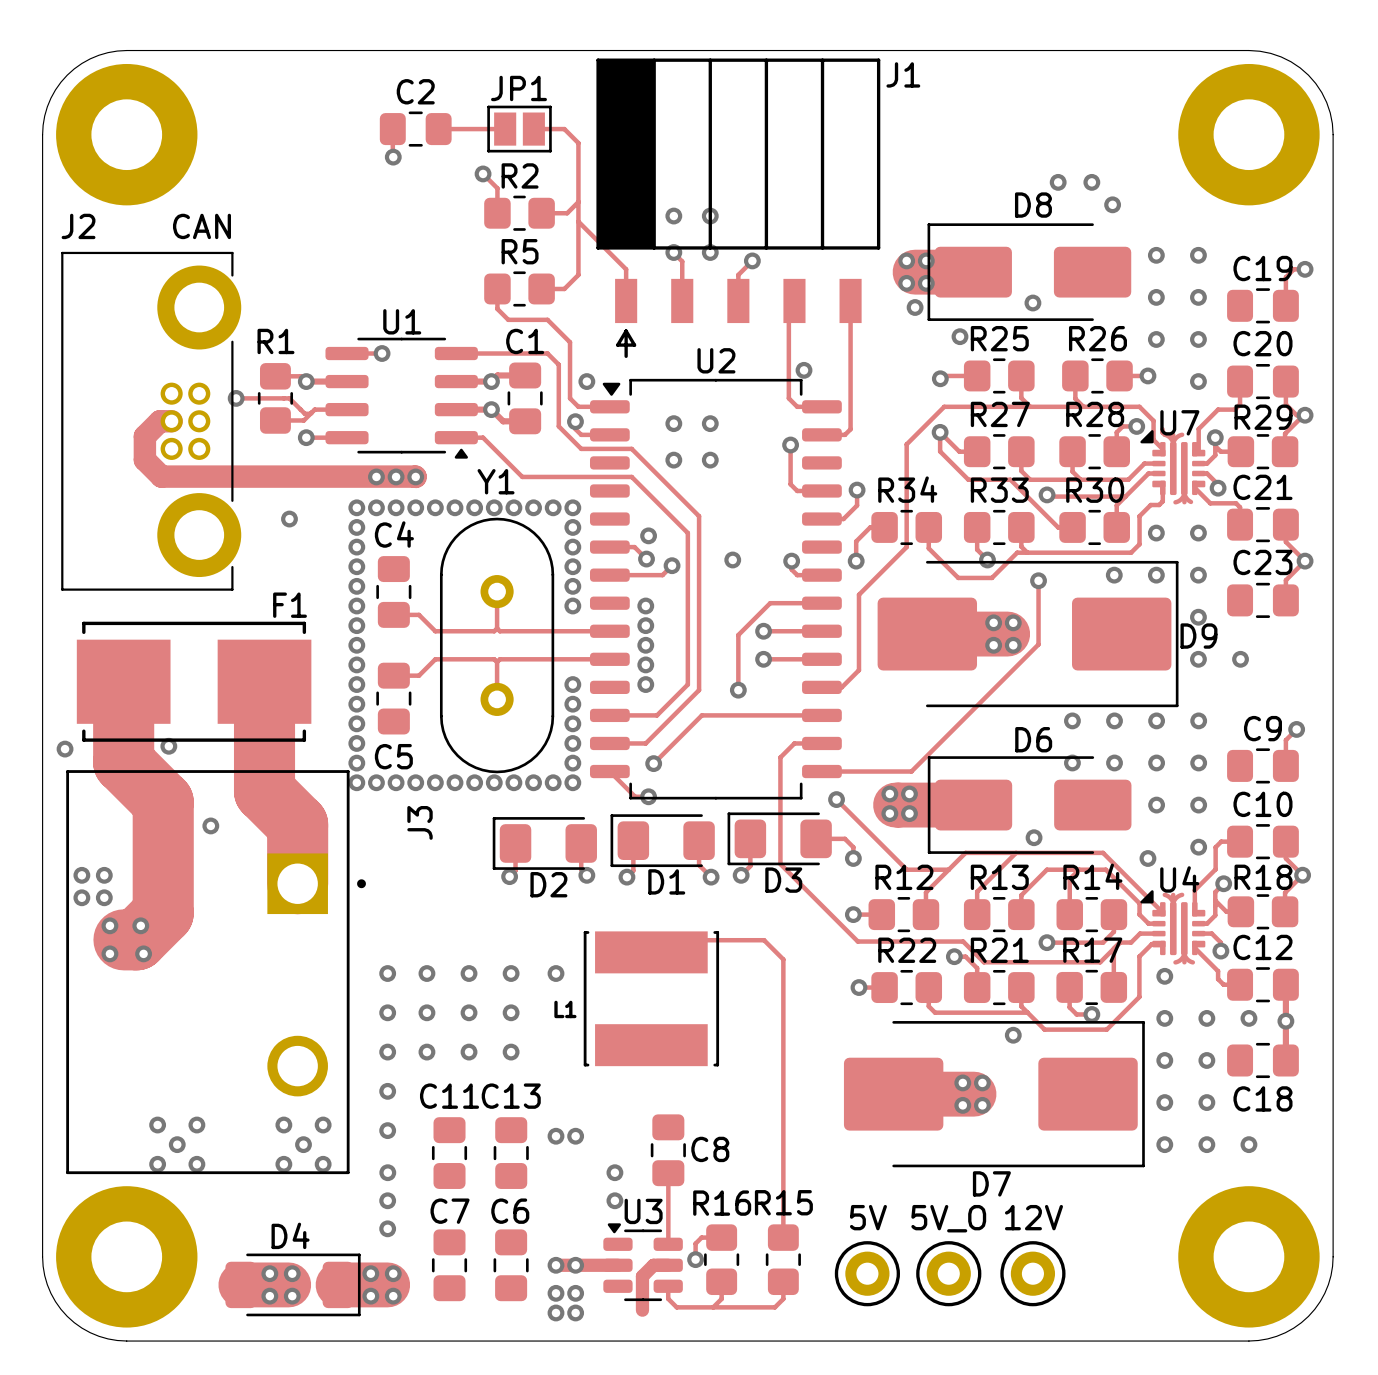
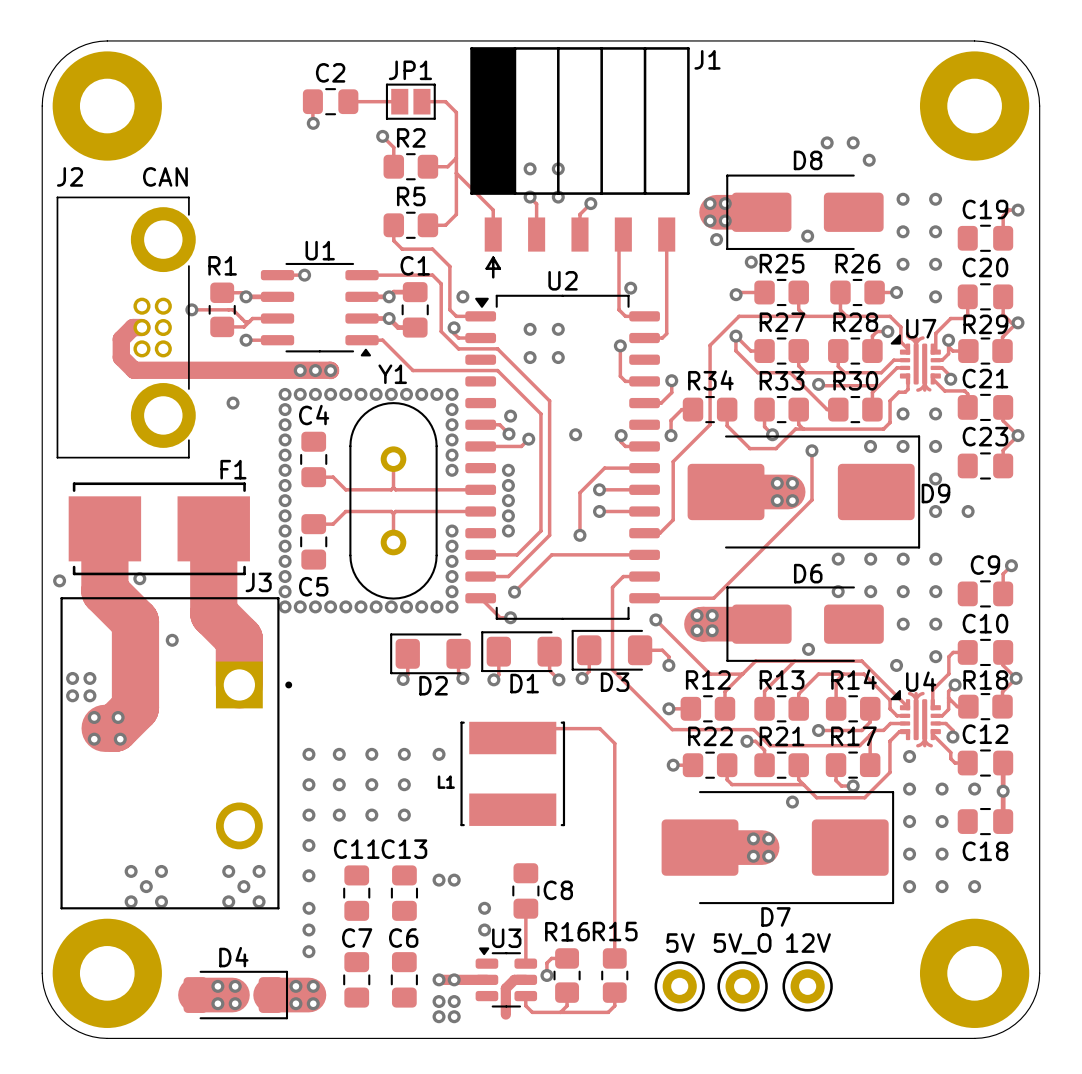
J3 name rotation: 0° (420, 822) -> 90° clockwise (258, 582)
J3 name position: J3 (420, 822) -> J3 (258, 582)

